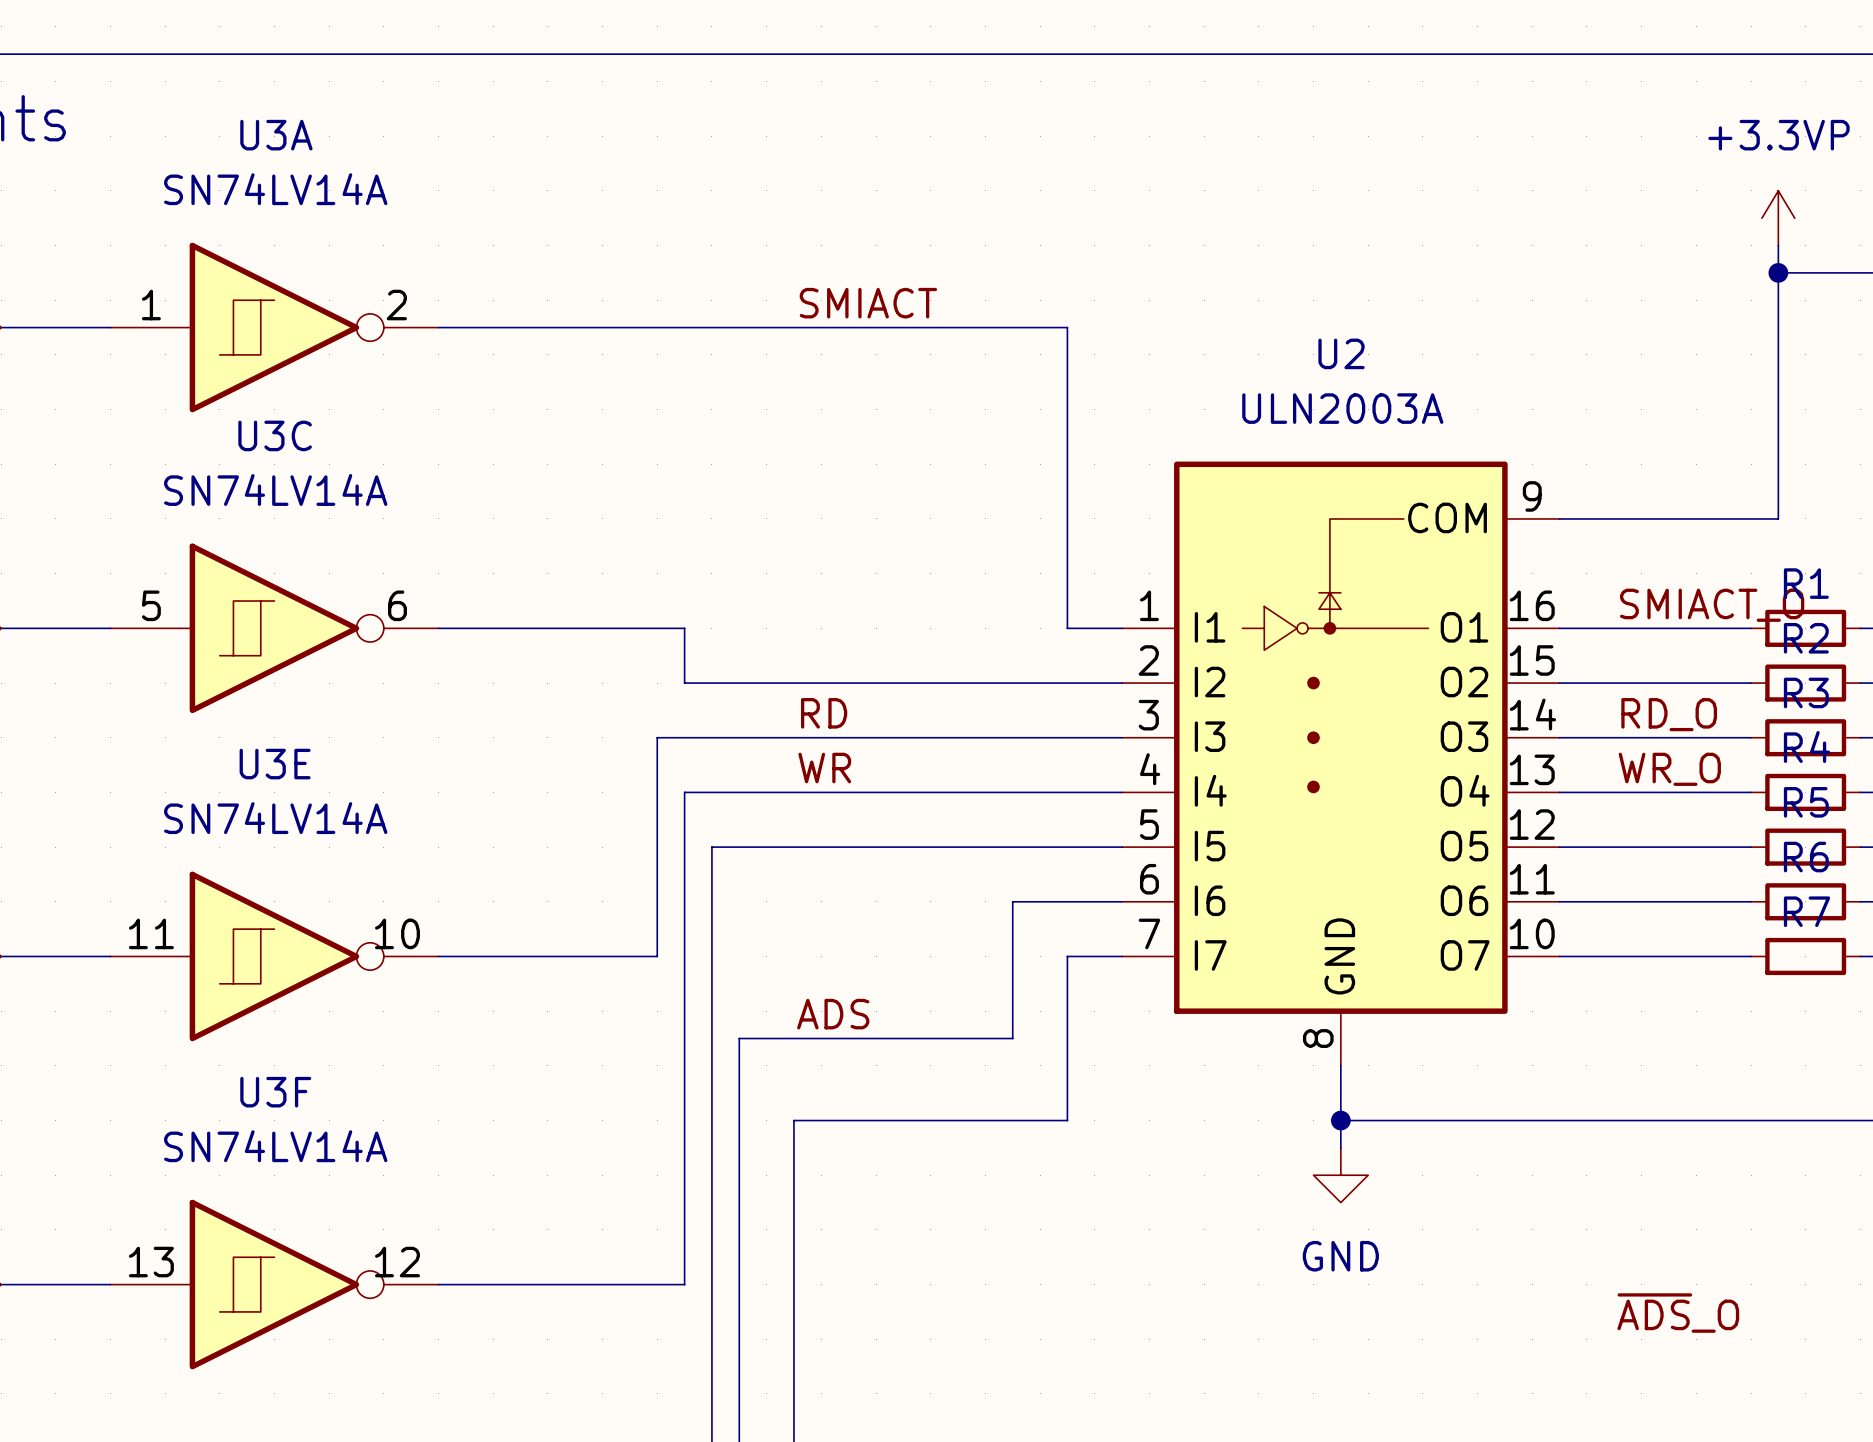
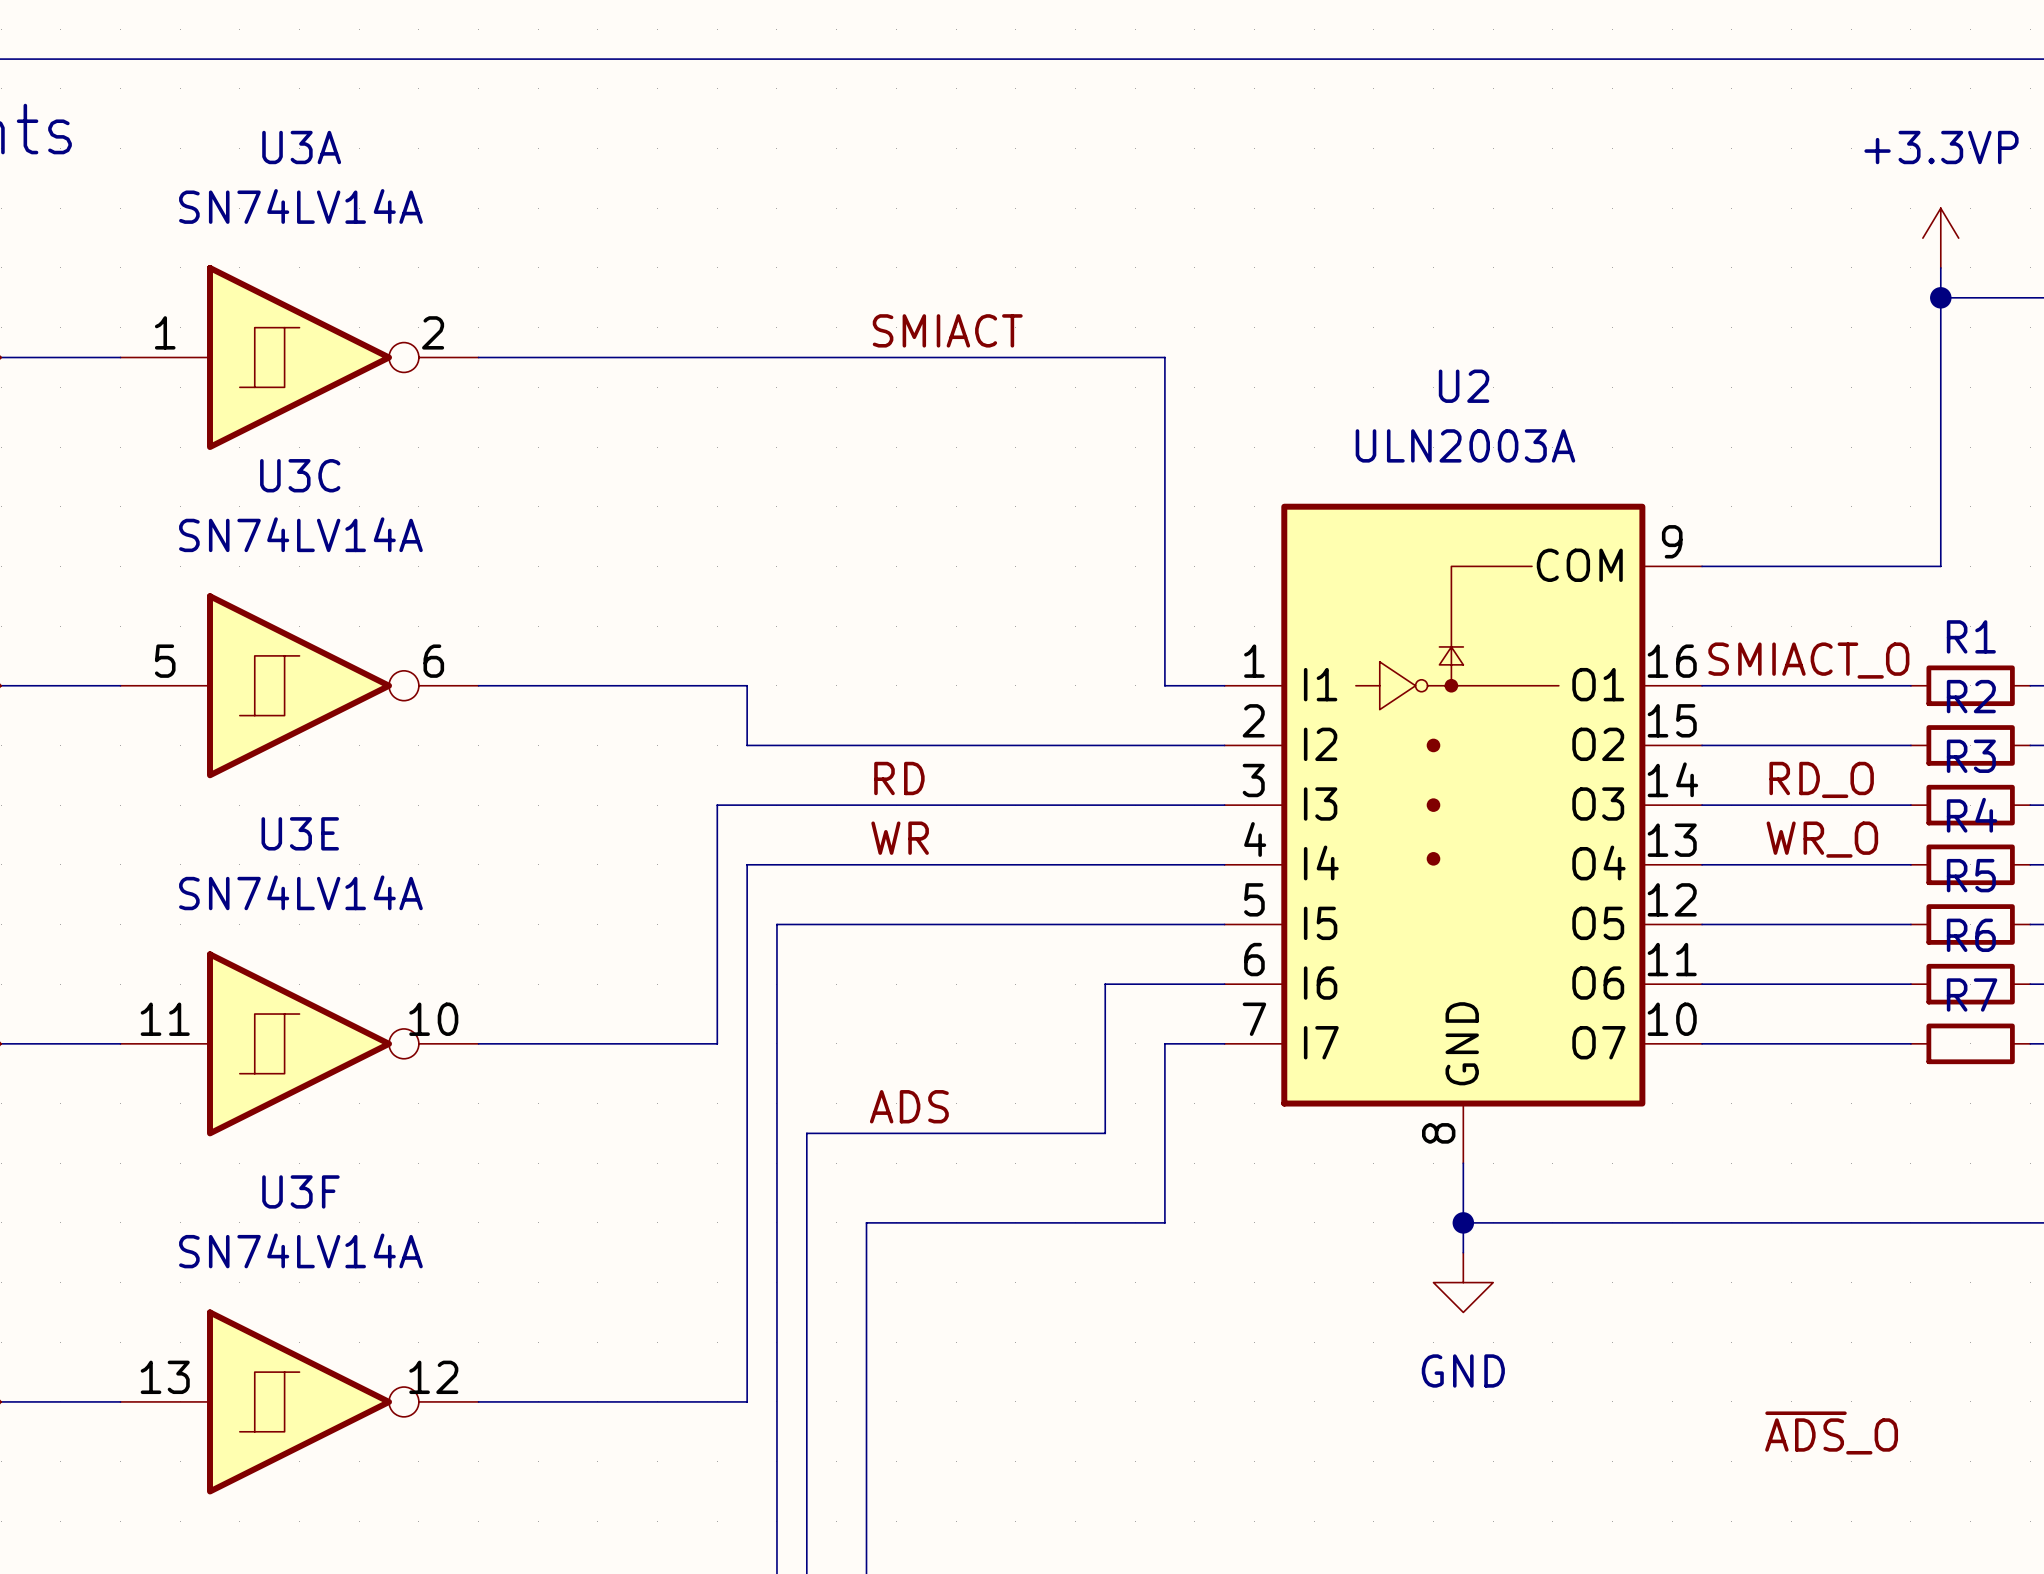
label position: SMIACT_O (1712, 605) -> SMIACT_O (1808, 660)

